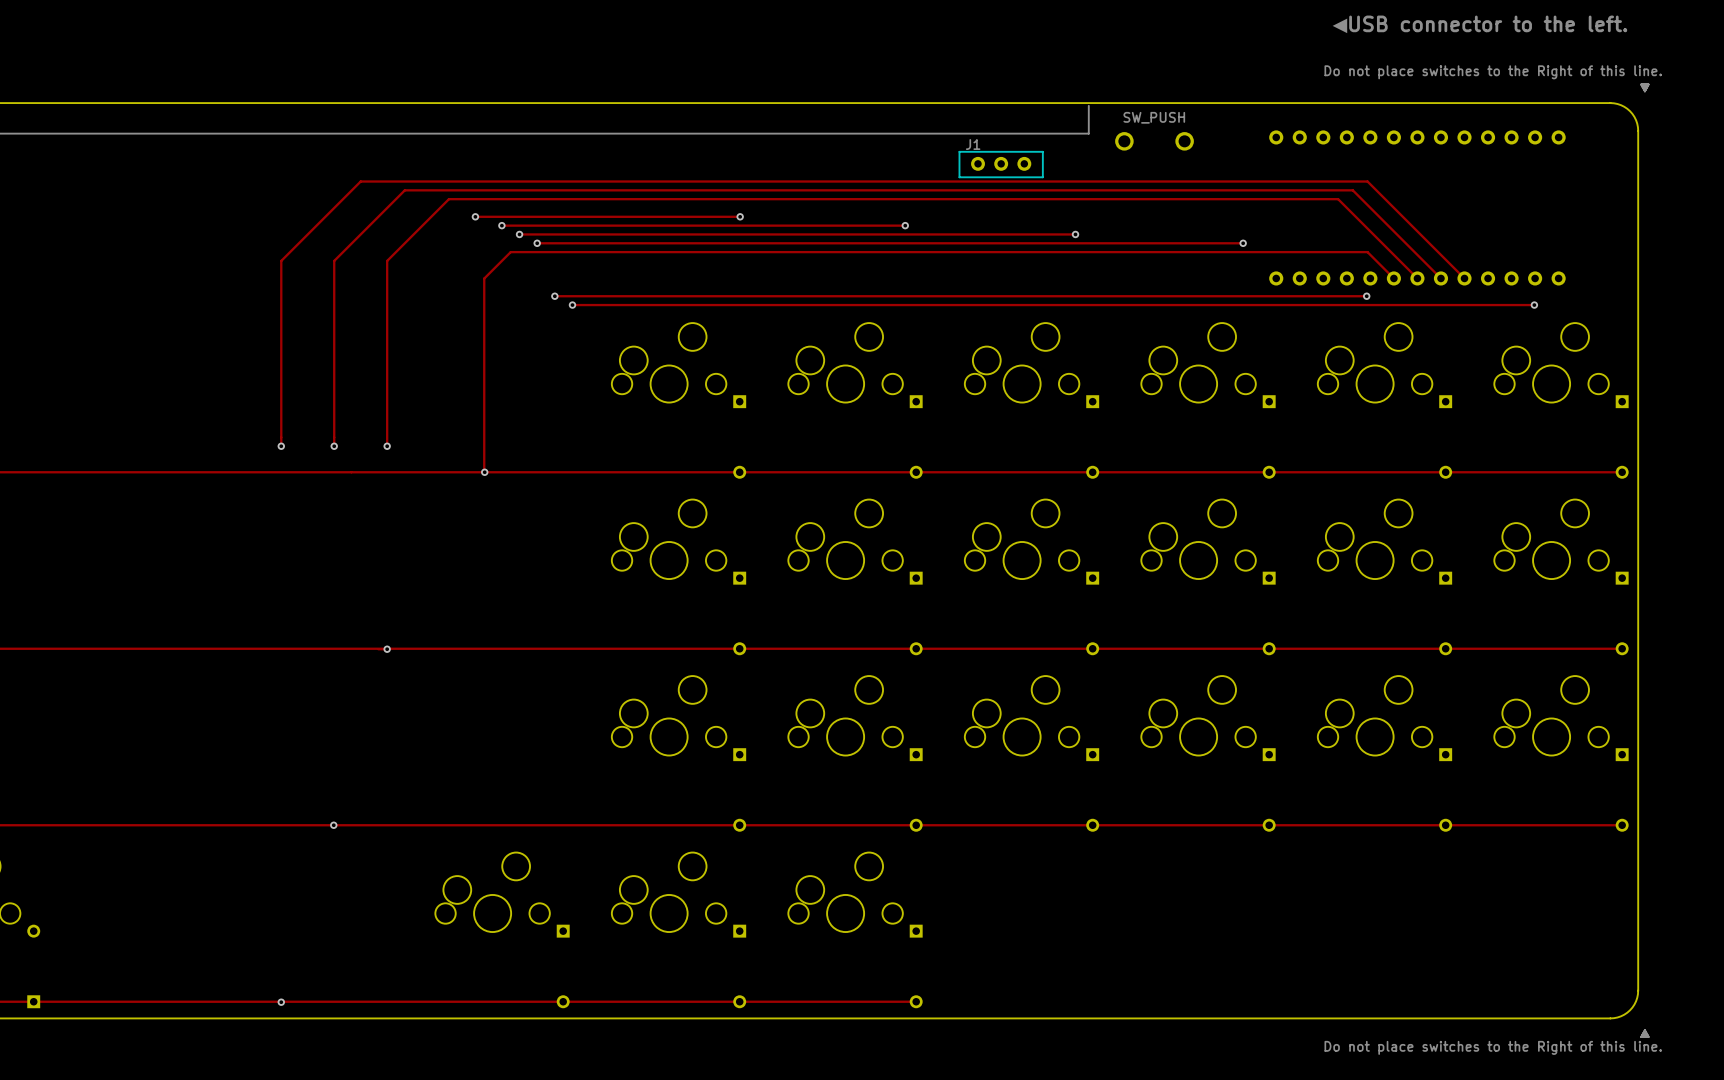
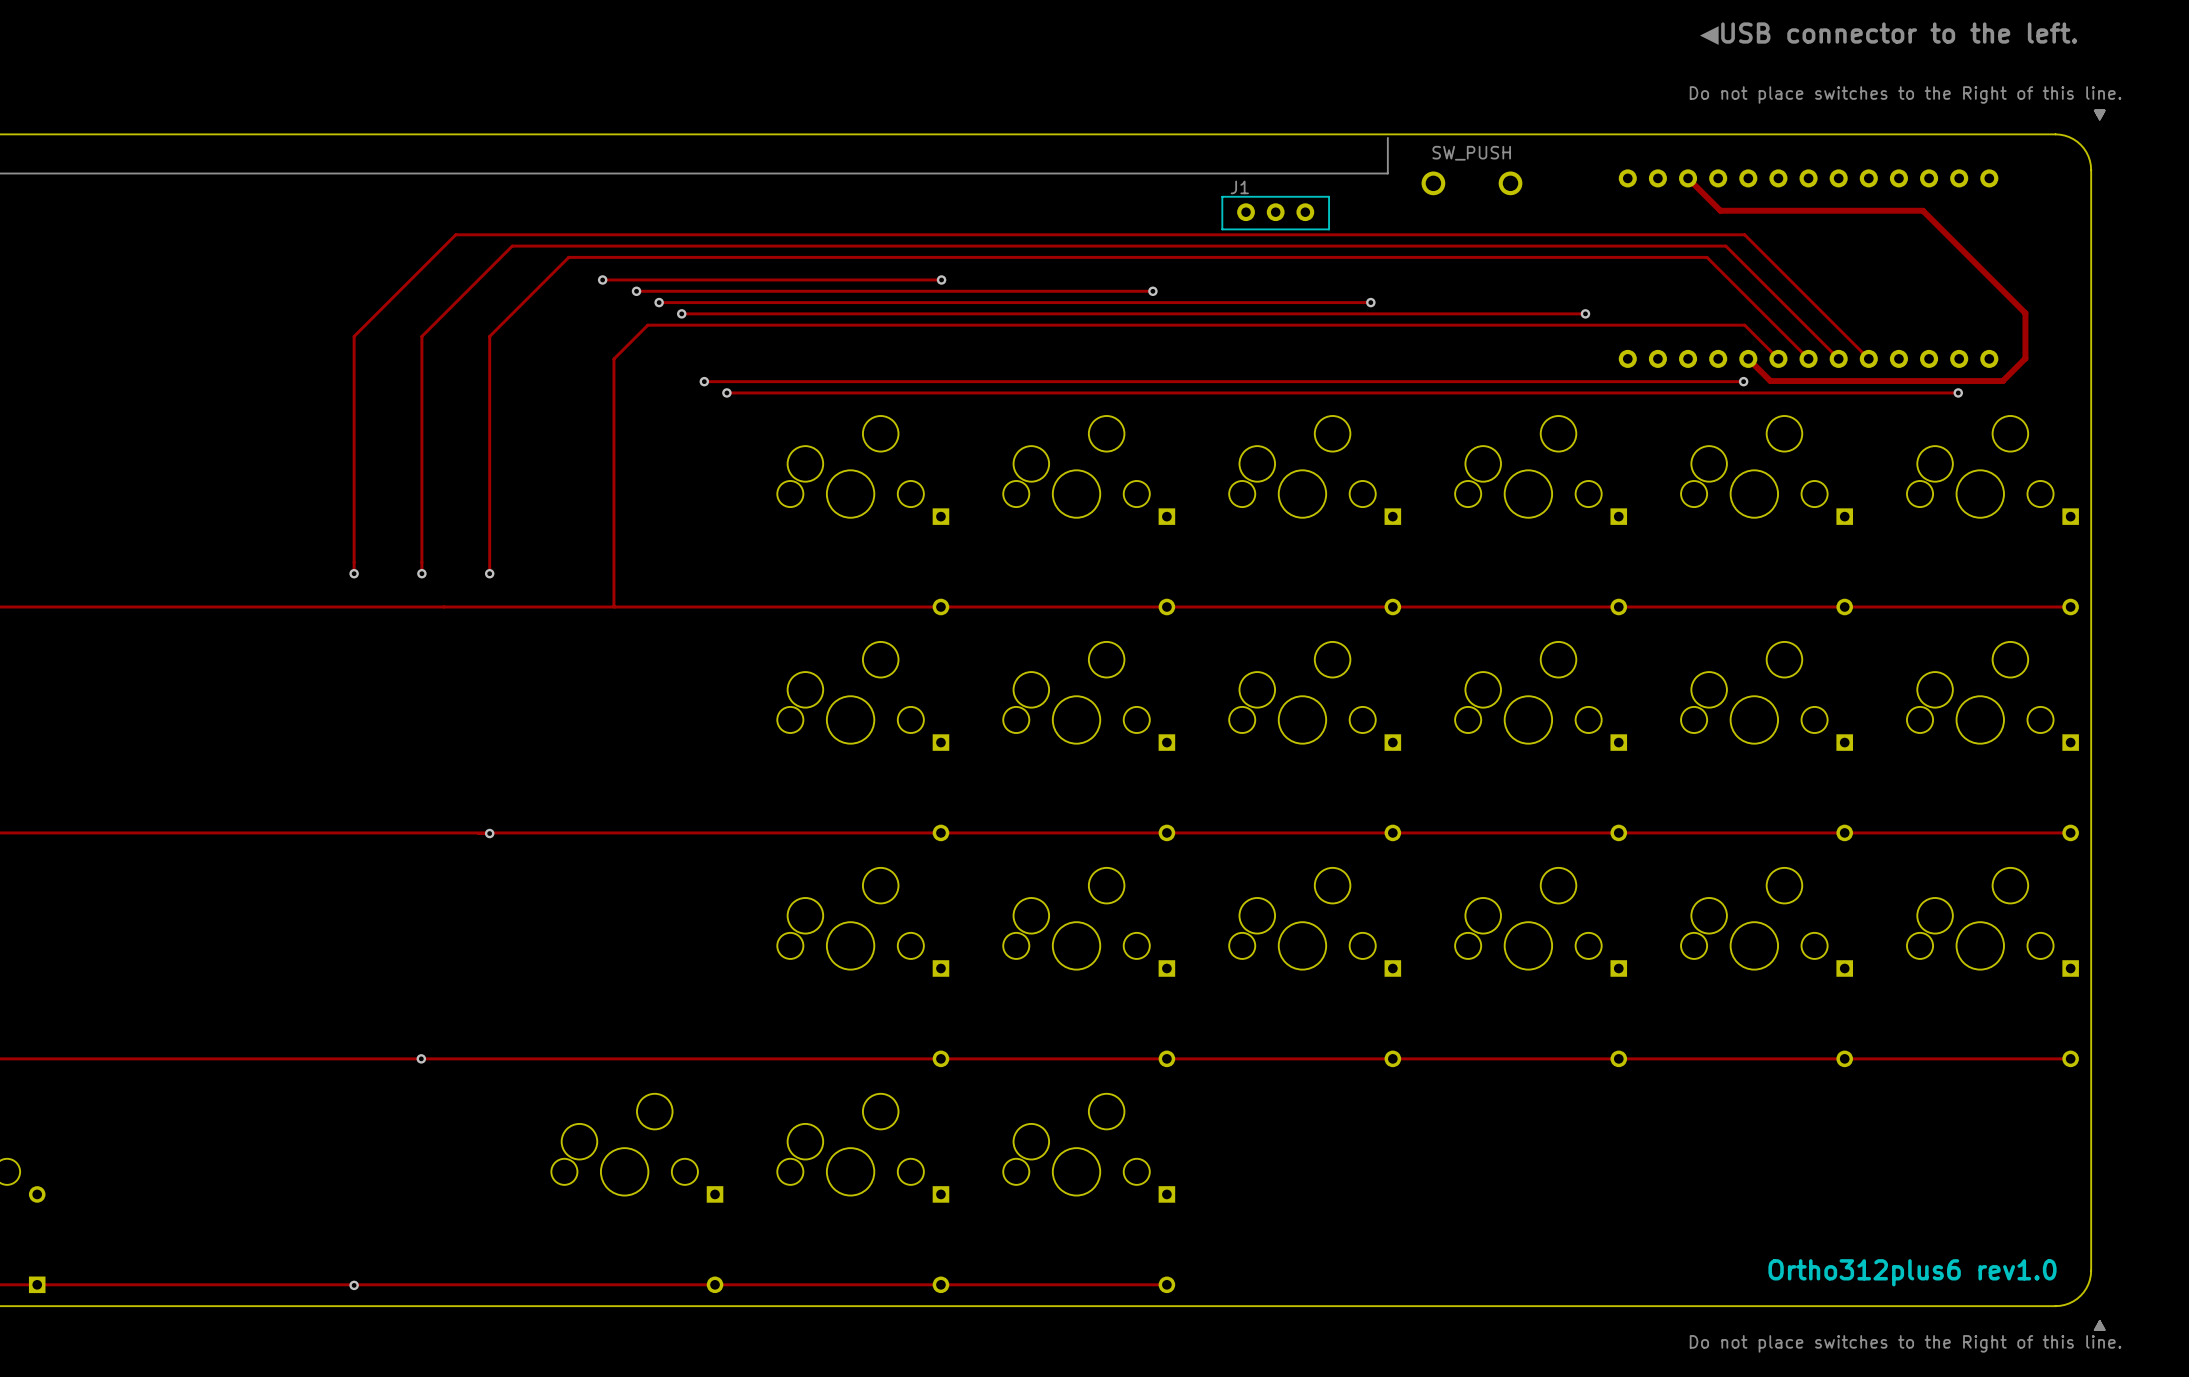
track: none -> (1688, 178) (1720, 210) (1922, 210) (2025, 313) (2025, 358) (2002, 381) (1770, 381) (1748, 358)
via: (484, 472) -> none
text: none -> Ortho312plus6 rev1.0 (1912, 1272)

